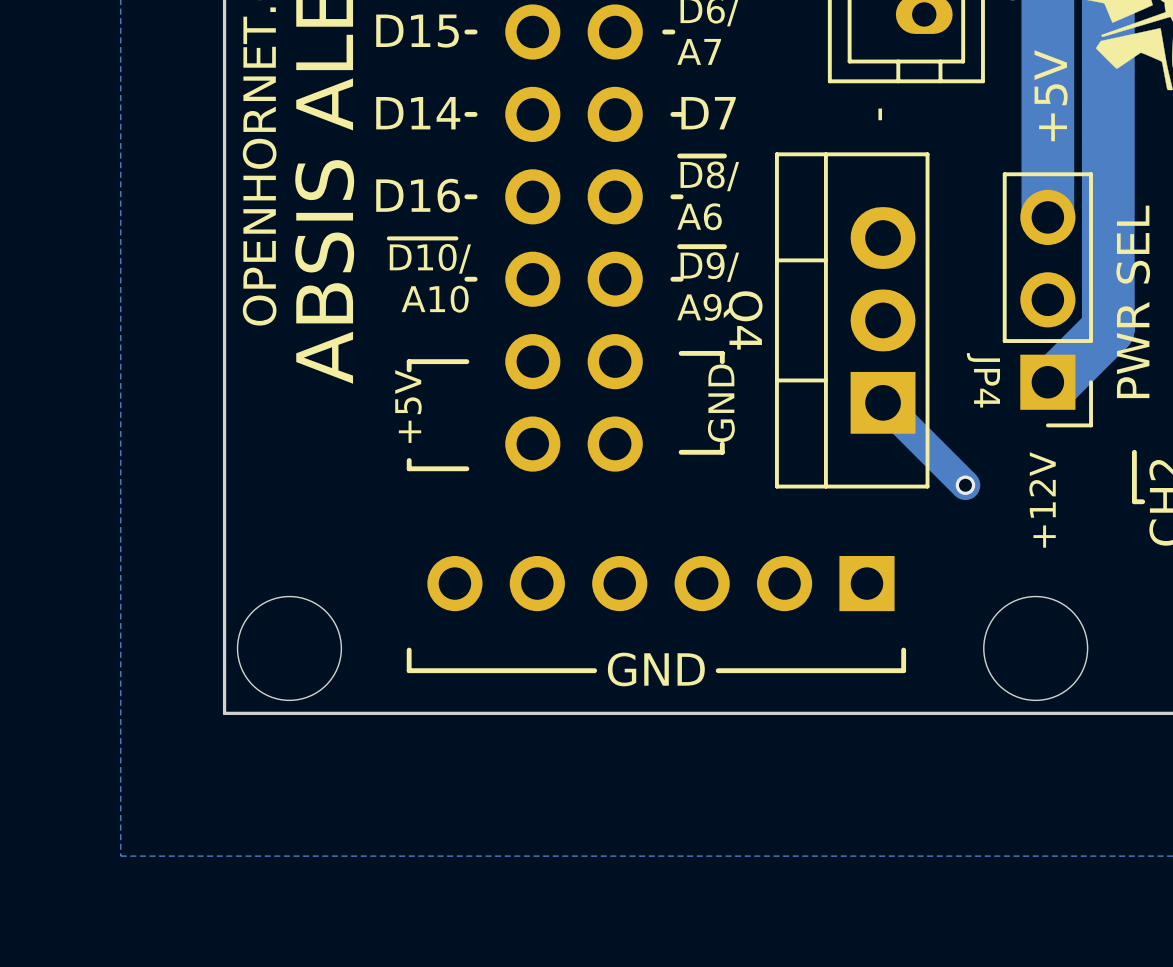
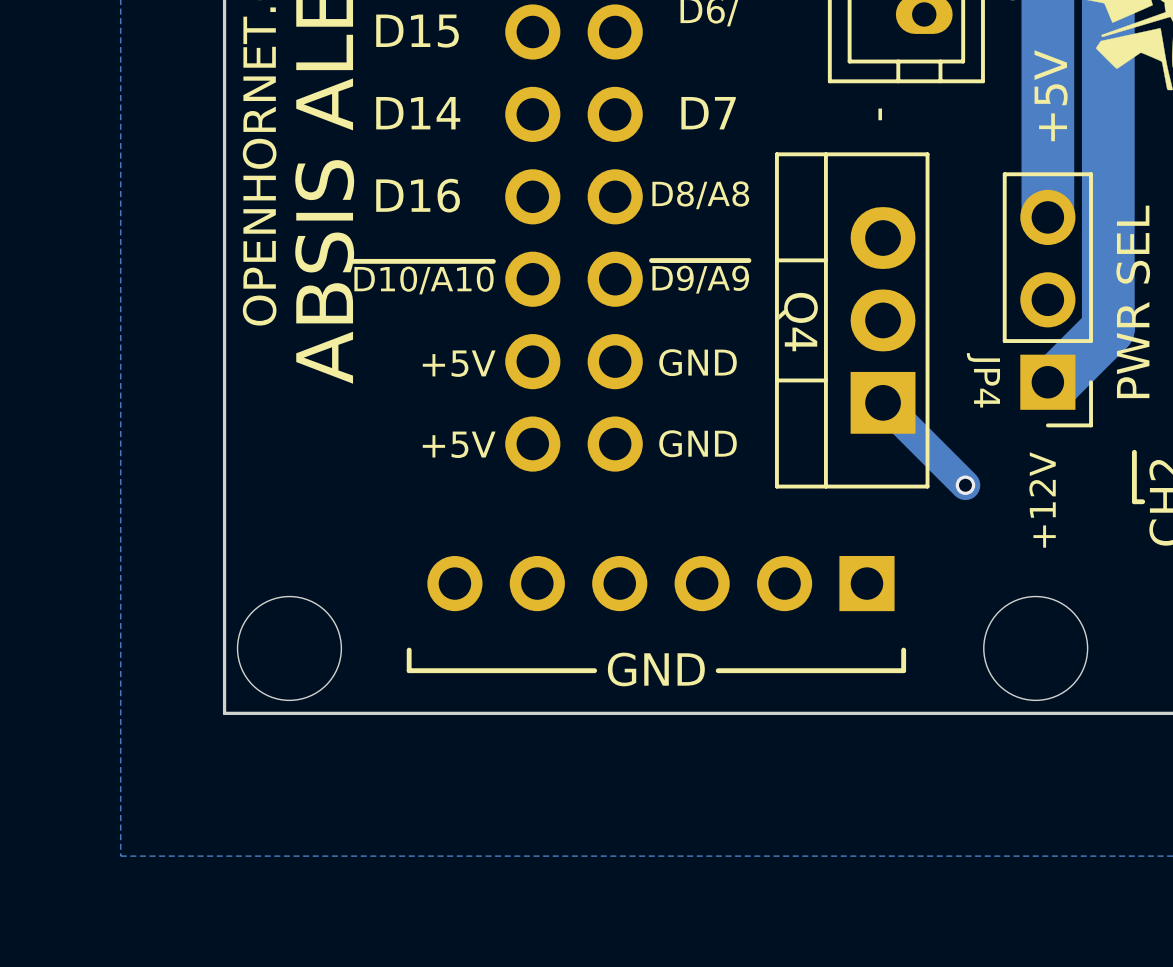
line: (475, 31) (466, 31) -> none
line: (672, 31) (664, 31) -> none
text: A7 (699, 51) -> none
line: (475, 114) (466, 114) -> none
line: (681, 114) (672, 114) -> none
text: ~{D8}/ (709, 173) -> none
text: none -> D8/A8 (700, 195)
line: (475, 196) (466, 196) -> none
line: (681, 196) (672, 196) -> none
text: A6 (699, 216) -> none
text: ~{D10}/ (429, 256) -> ~{D10/A10} (423, 277)
text: ~{D9}/ (709, 264) -> ~{D9/A9} (700, 277)
line: (475, 279) (466, 279) -> none
line: (681, 279) (672, 279) -> none
text: A10 (435, 299) -> none
text: A9 (699, 307) -> none
Q4 name position: Q4 (743, 320) -> Q4 (798, 322)
line: (681, 353) (722, 353) (722, 361) -> none
line: (466, 361) (409, 361) (409, 369) -> none
text: none -> GND (698, 362)
text: none -> +5V (459, 363)
text: GND (721, 403) -> none
text: +5V (408, 406) -> none
text: none -> GND (698, 443)
text: none -> +5V (459, 444)
line: (722, 444) (722, 452) (681, 452) -> none
line: (409, 460) (409, 468) (466, 468) -> none

